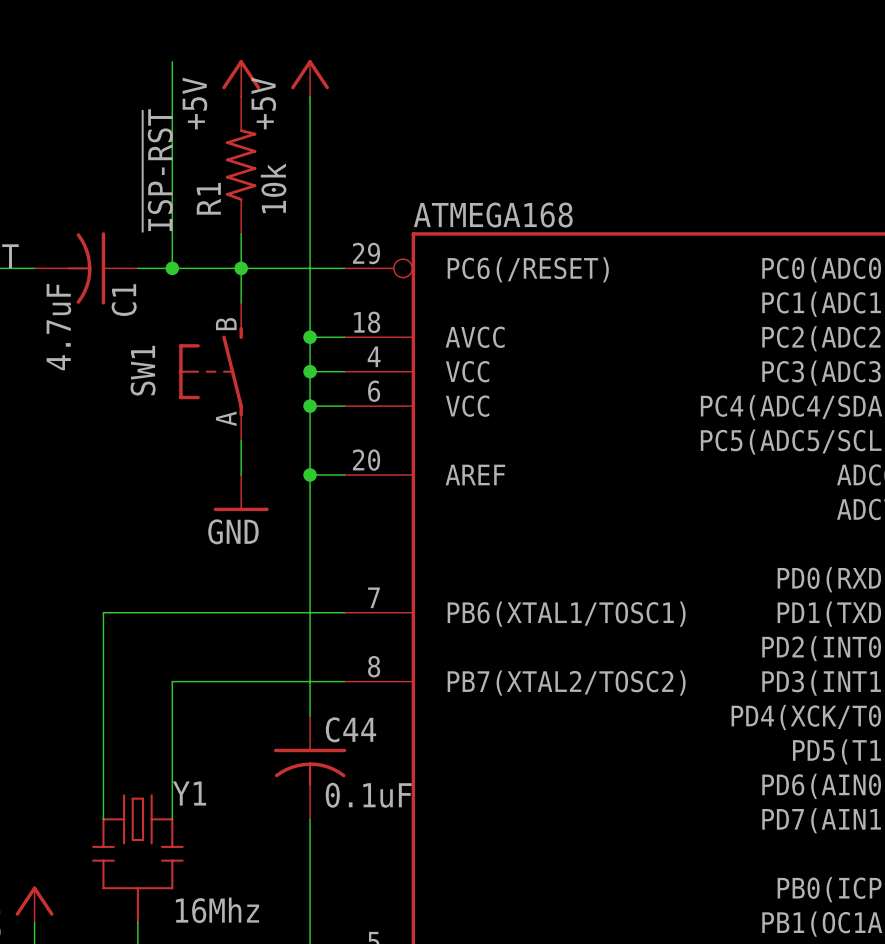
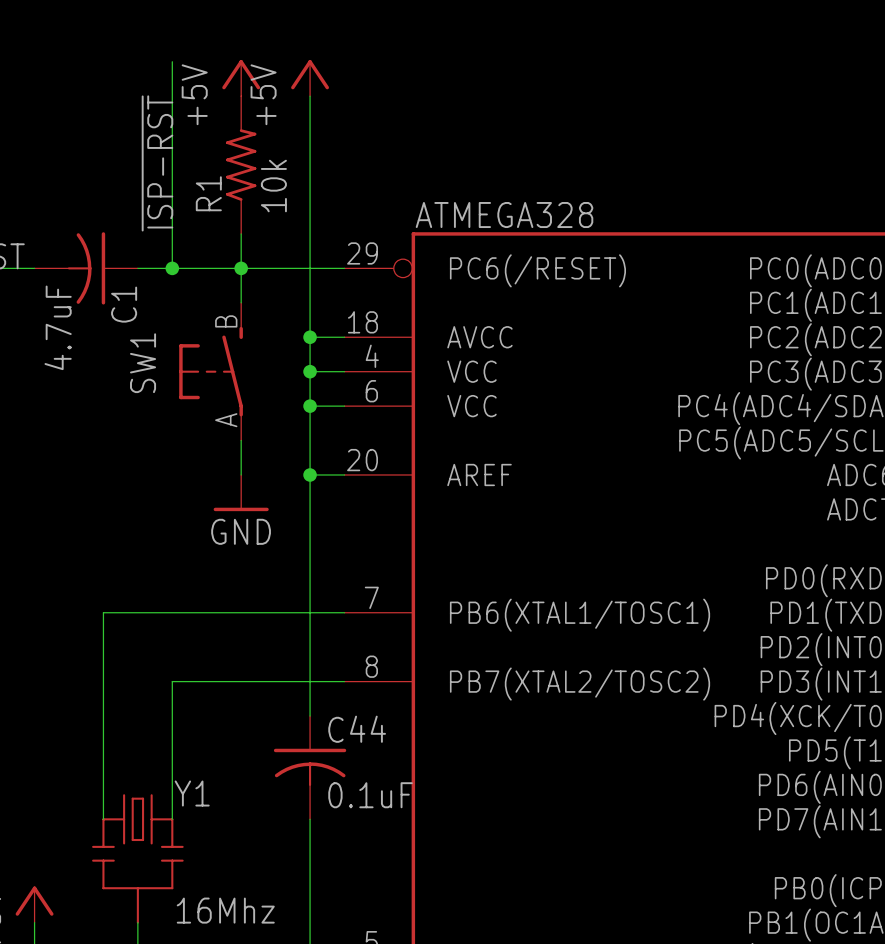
part value: ATMEGA168 (493, 215) -> ATMEGA328 (504, 215)

